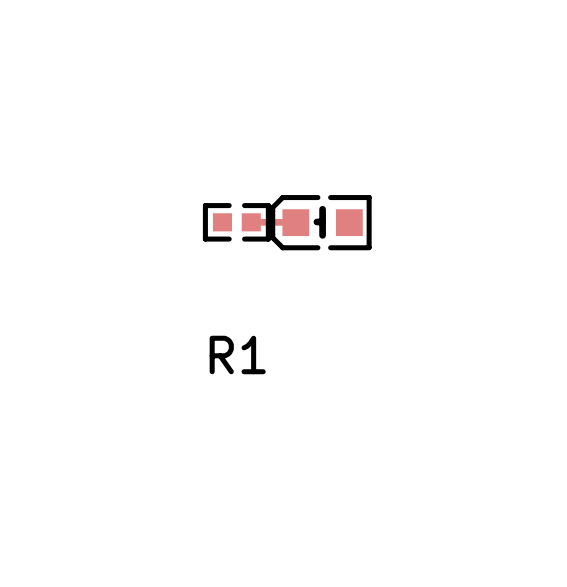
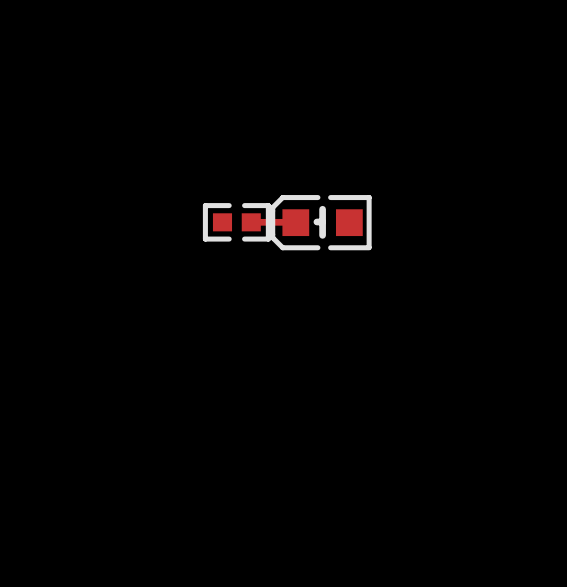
R1 name: R1 (237, 354) -> none

